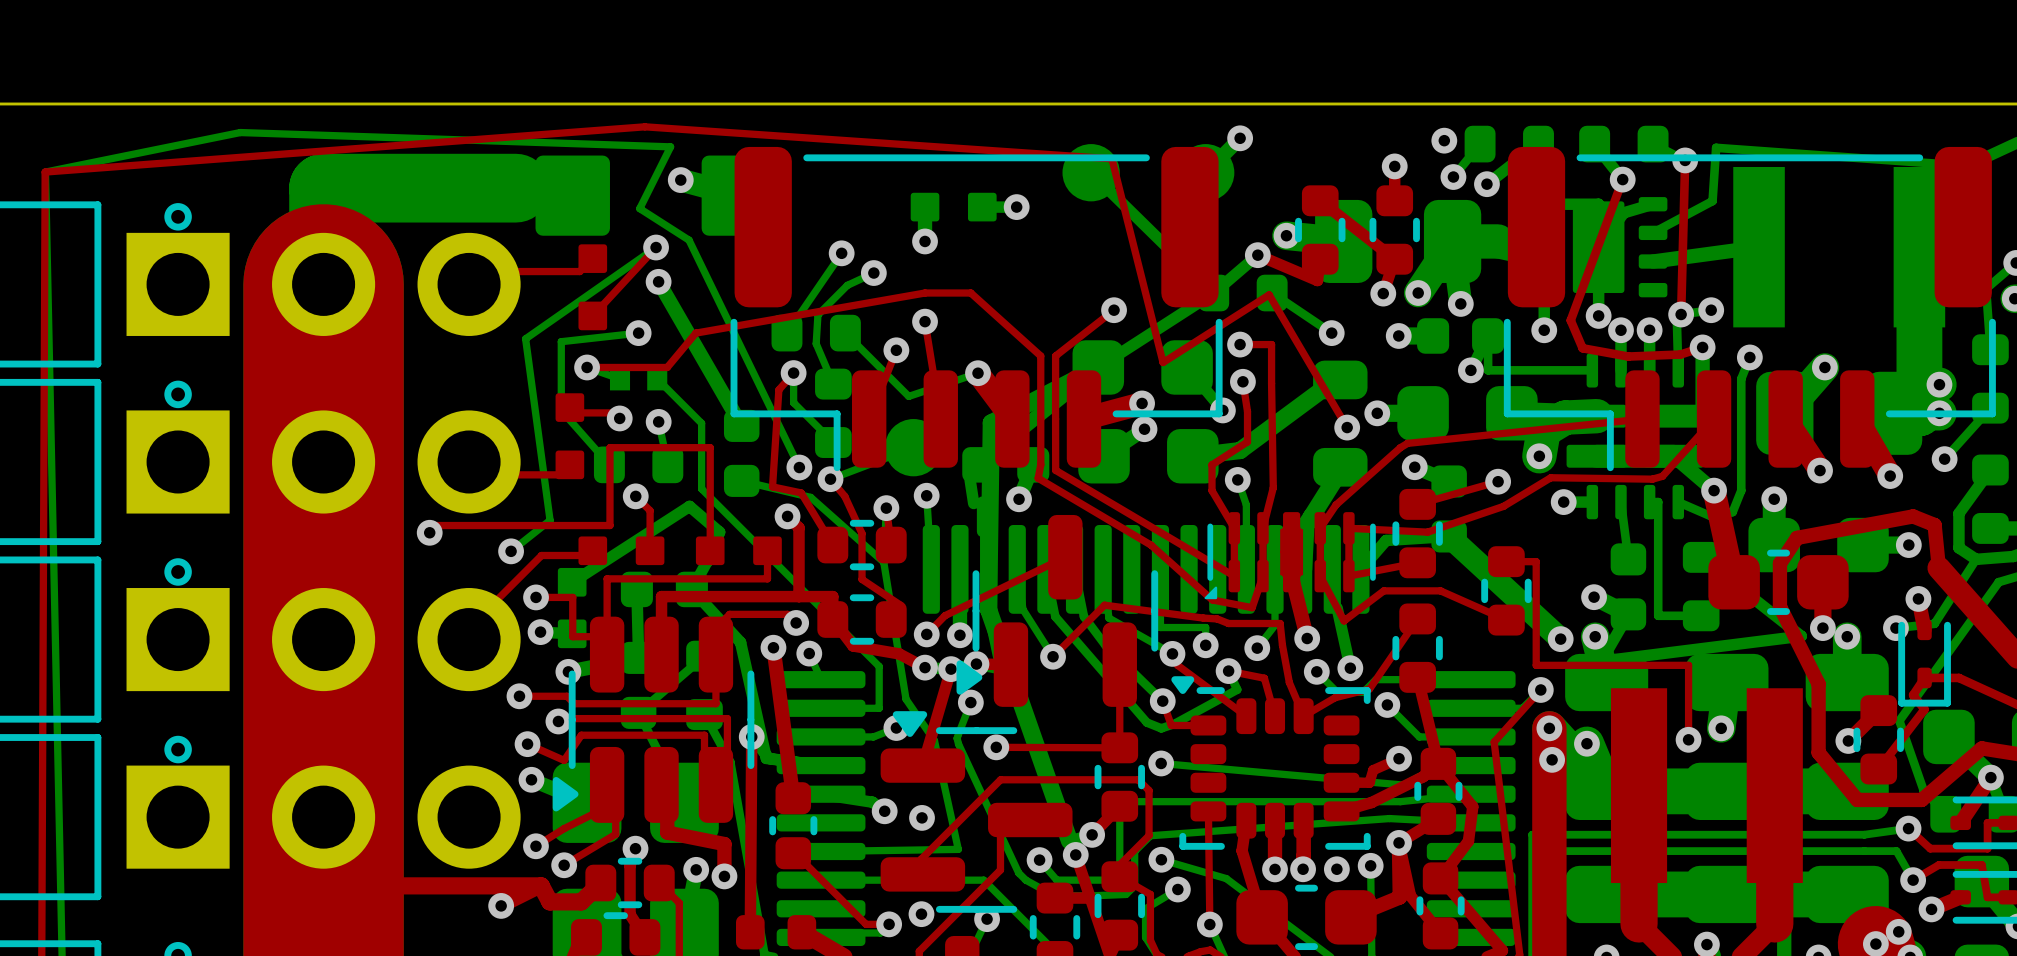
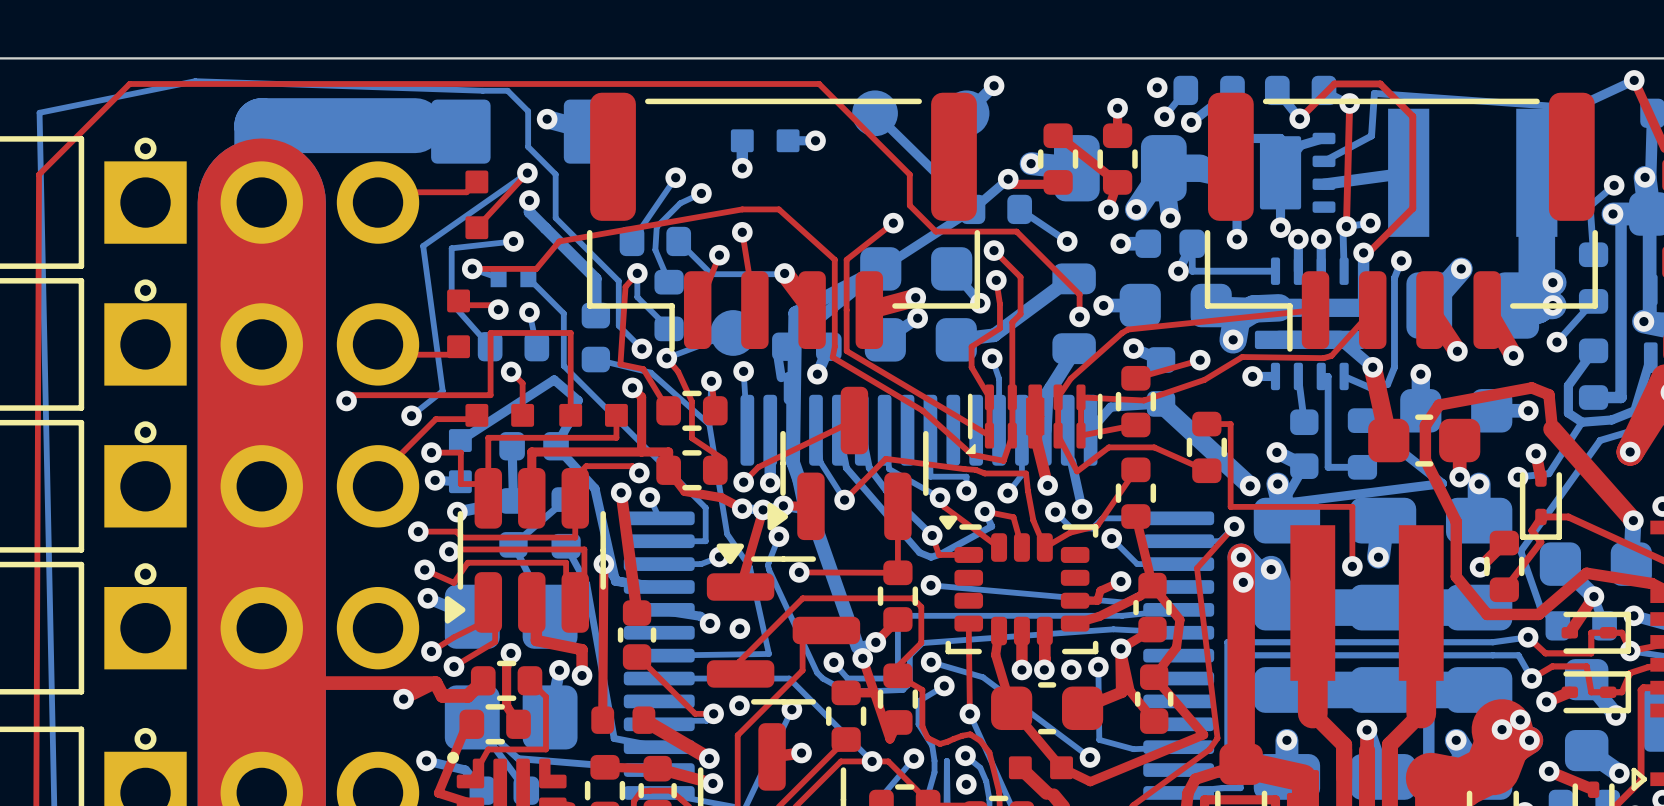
bottom track: (600, 144) (670, 146) (639, 208) (689, 240) (799, 467) -> (482, 90) (507, 90) (528, 111) (528, 146) (555, 174) (555, 218) (618, 281) (618, 325) (641, 348)
top track: (1622, 179) (1570, 320) (1582, 348) (1628, 356) (1680, 354) (1702, 347) -> (1299, 118) (1334, 83) (1380, 83) (1412, 116) (1412, 208) (1368, 252) (1363, 252)
top track: (44, 249) (45, 172) (644, 126) (1111, 158) (1163, 362) (1269, 294) (1347, 427) -> (39, 174) (129, 83) (819, 83) (909, 174) (909, 205) (935, 231) (1016, 231) (1079, 294) (1079, 316)
top track: (1257, 255) (1317, 280) (1320, 259) -> (1008, 179) (1013, 184) (1056, 184) (1058, 182)
bottom track: (658, 281) (741, 425) -> (529, 200) (529, 212) (595, 278) (595, 315)
bottom track: (845, 333) (908, 396) (978, 373) -> (678, 241) (711, 274) (784, 273)
top track: (1240, 344) (1271, 344) (1273, 487) (1262, 528) -> (994, 250) (1020, 277) (1020, 314) (1012, 322) (1012, 397)

